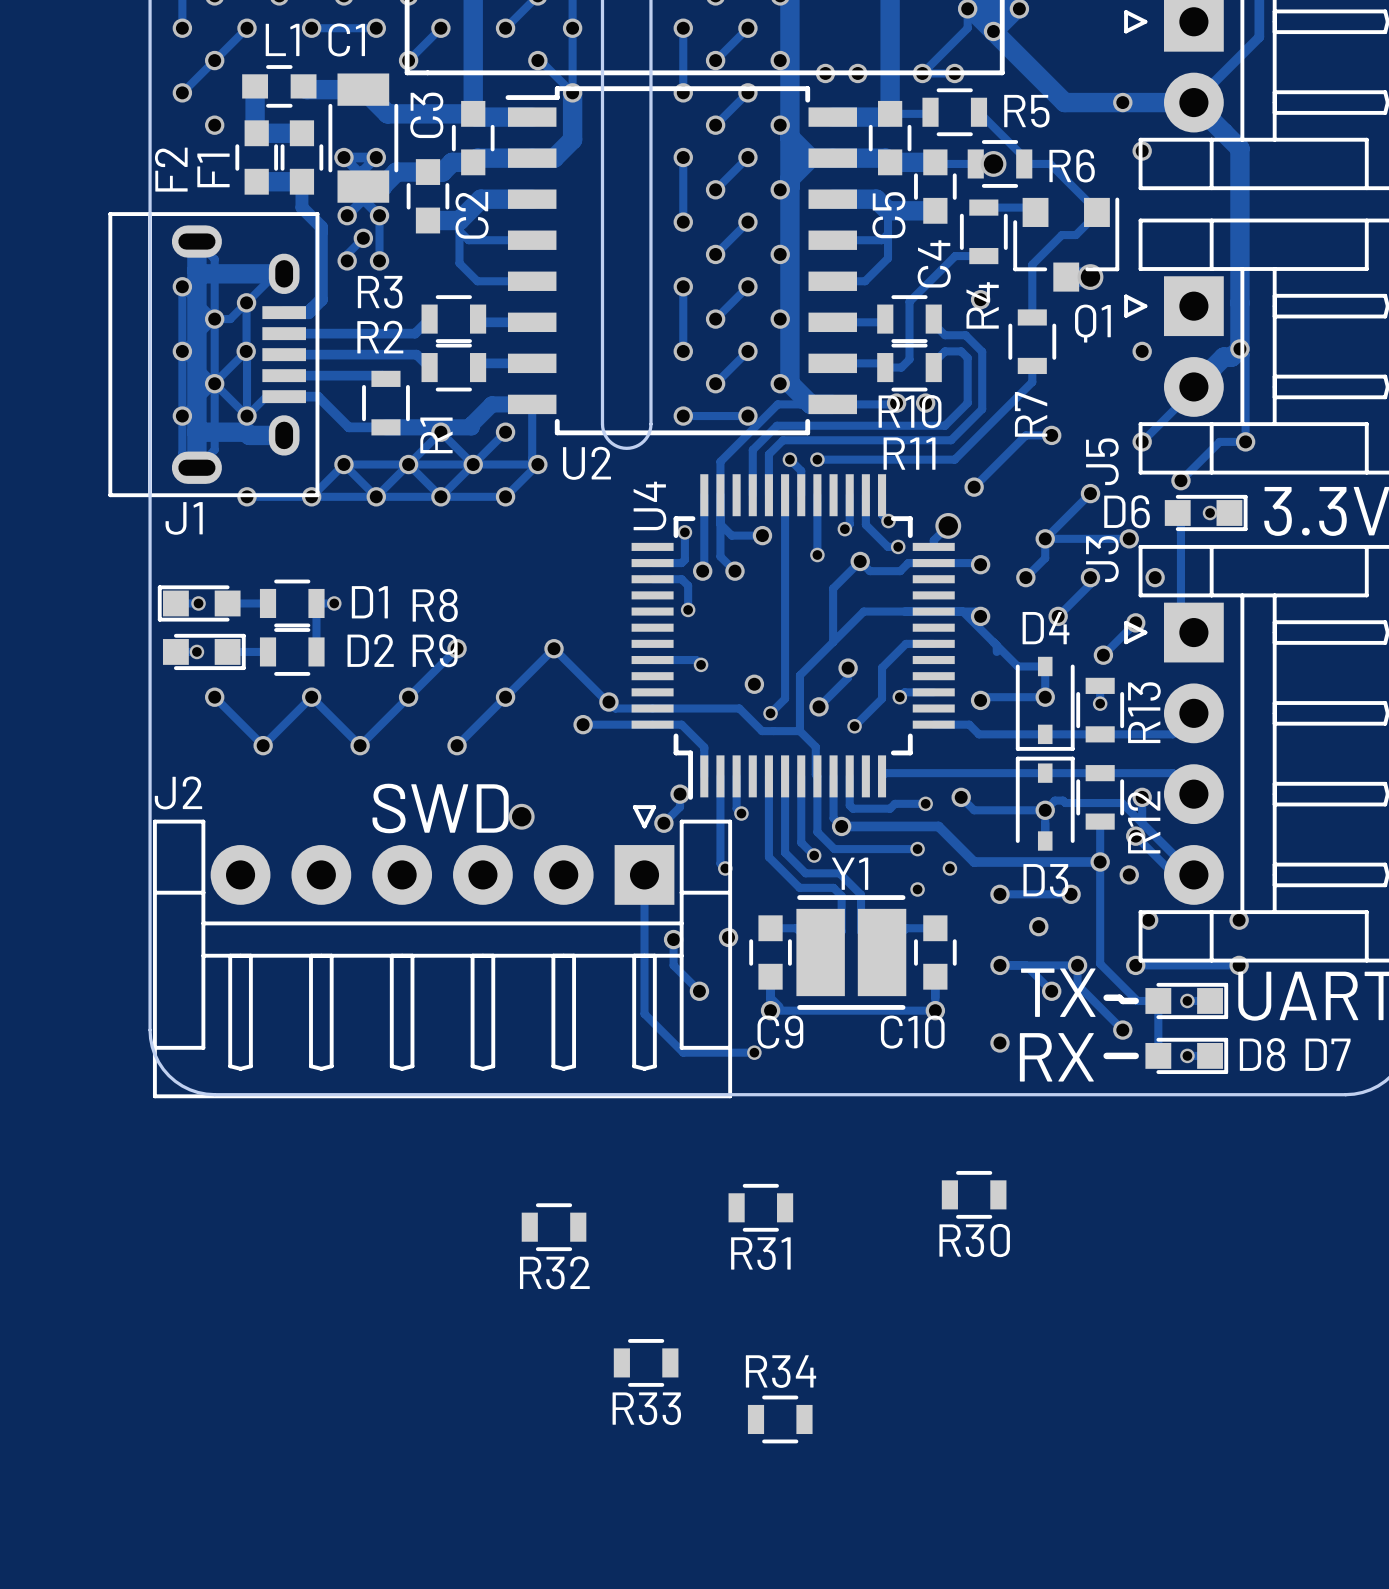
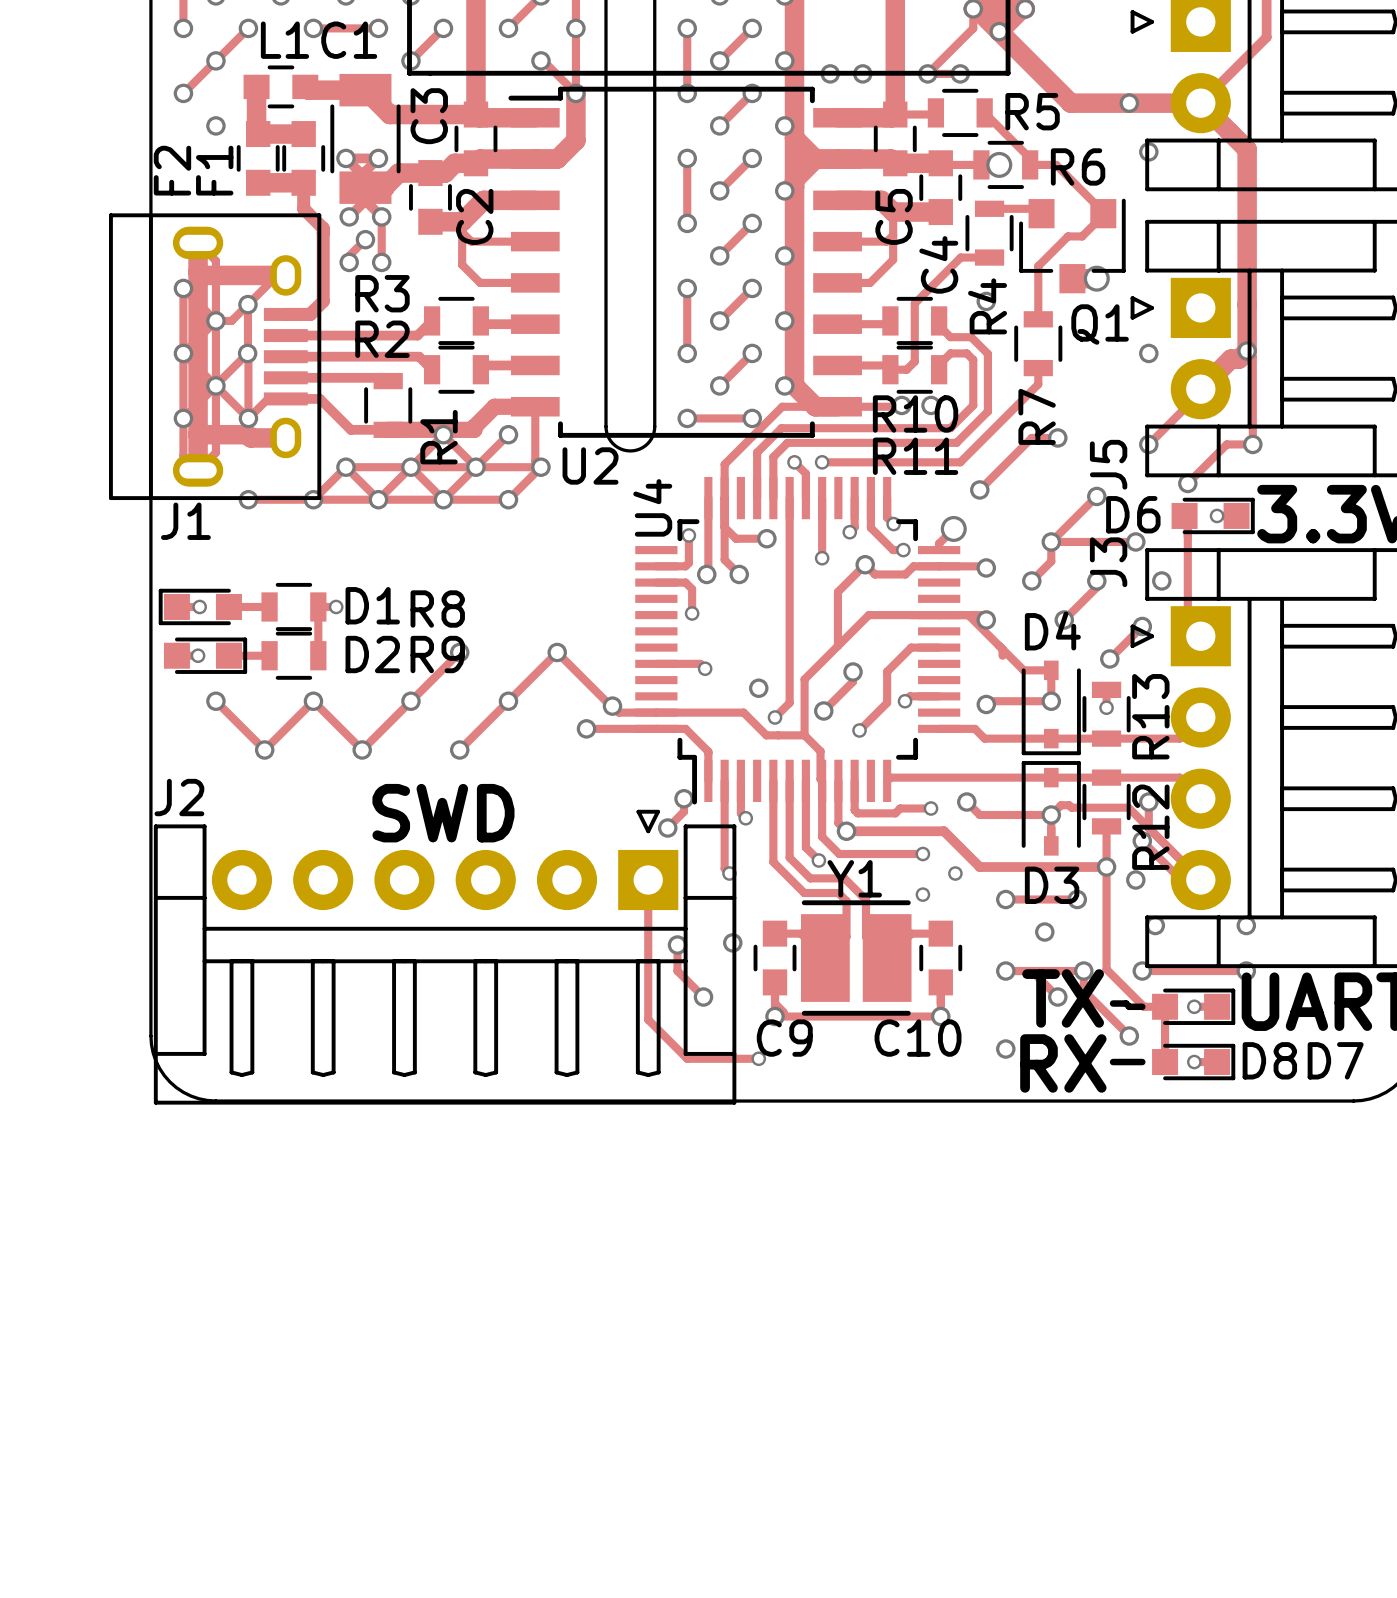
via: (521, 816) -> none
R30: (974, 1194) -> none
R31: (760, 1207) -> none
R32: (554, 1227) -> none
R33: (646, 1362) -> none
R34: (780, 1419) -> none

